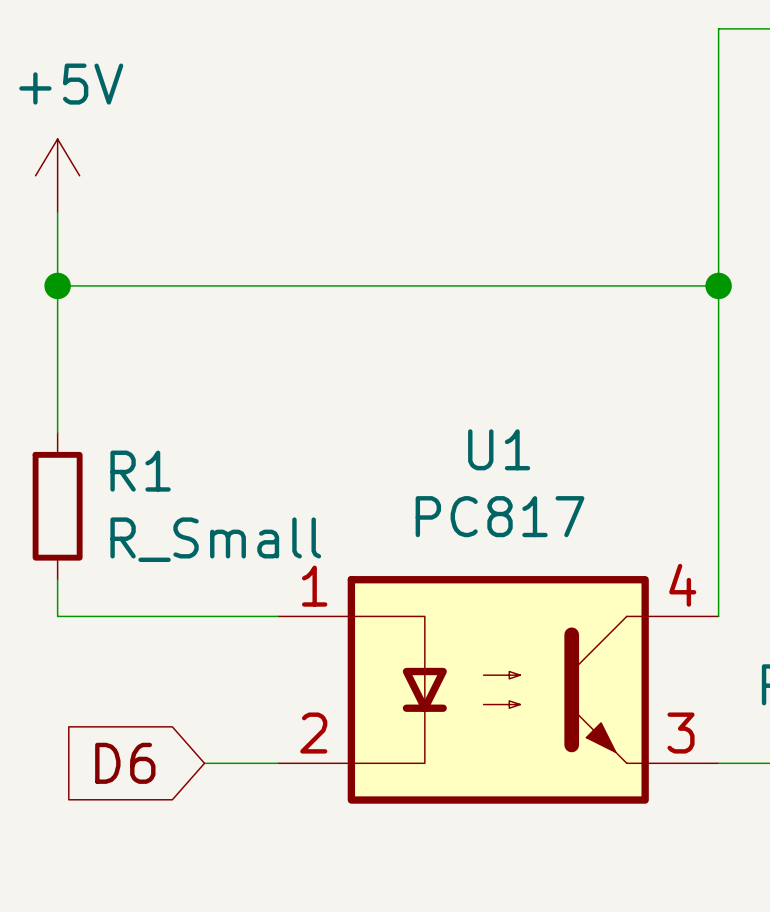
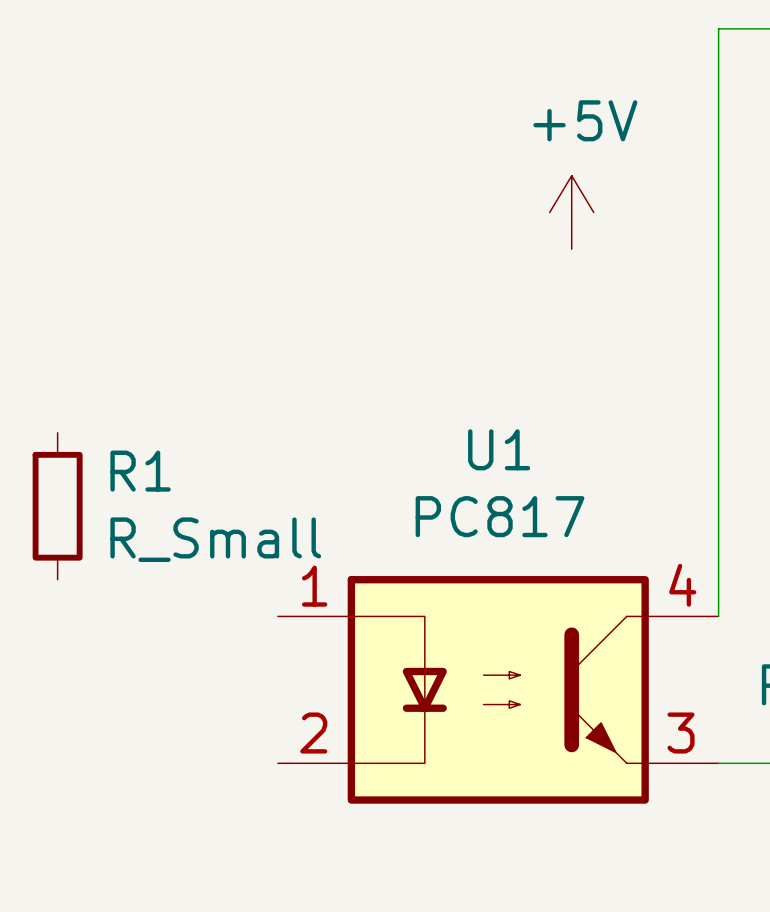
power symbol position: +5V (57, 175) -> +5V (571, 212)
wire: (57, 212) (57, 432) -> none
wire: (57, 285) (718, 285) -> none
junction: (57, 285) -> none
junction: (718, 285) -> none
wire: (57, 579) (57, 616) (277, 616) -> none
global label: D6 (125, 763) -> none
wire: (204, 763) (277, 763) -> none

